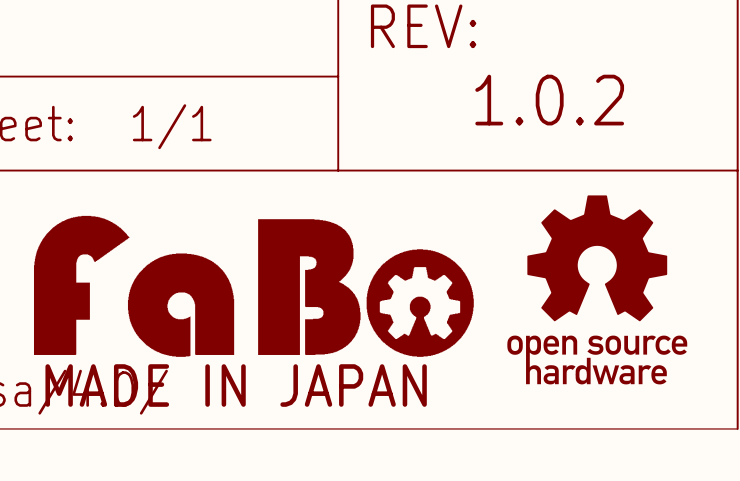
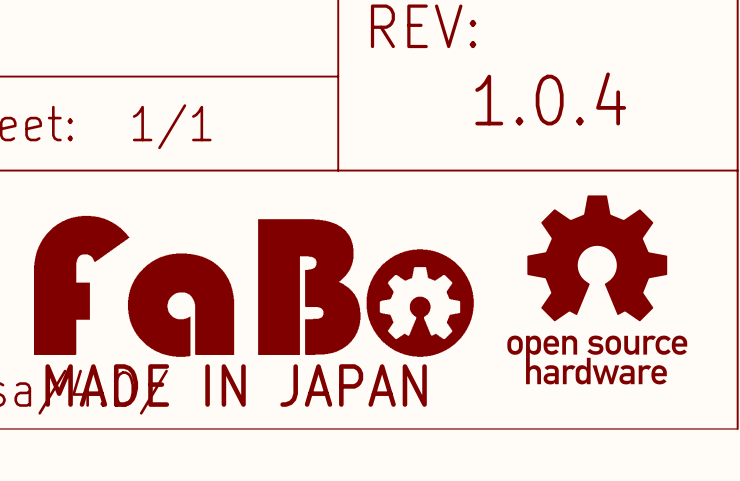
text: 1.0.2 (549, 100) -> 1.0.4 (550, 98)

